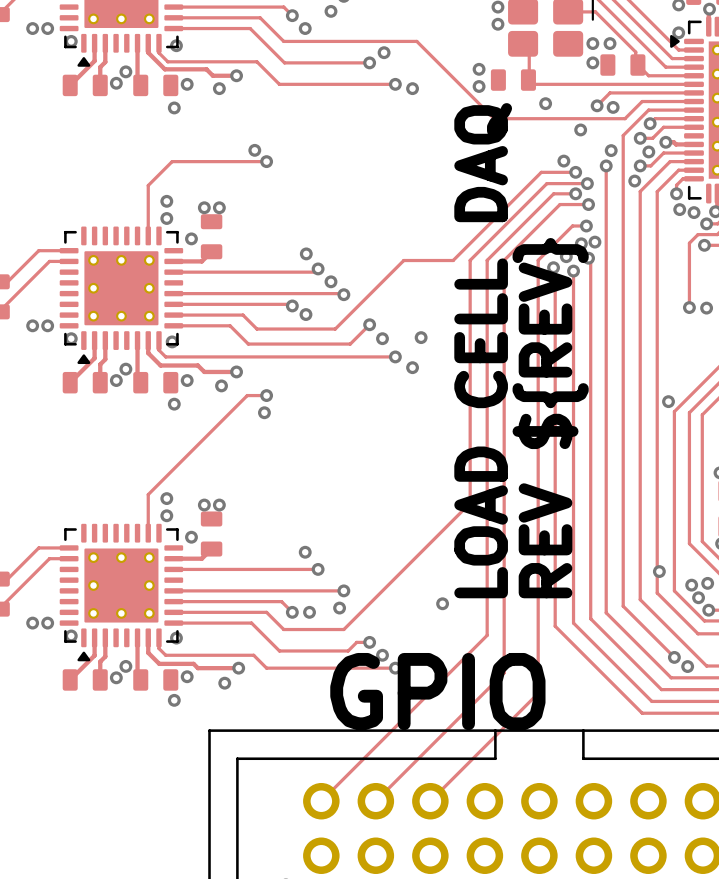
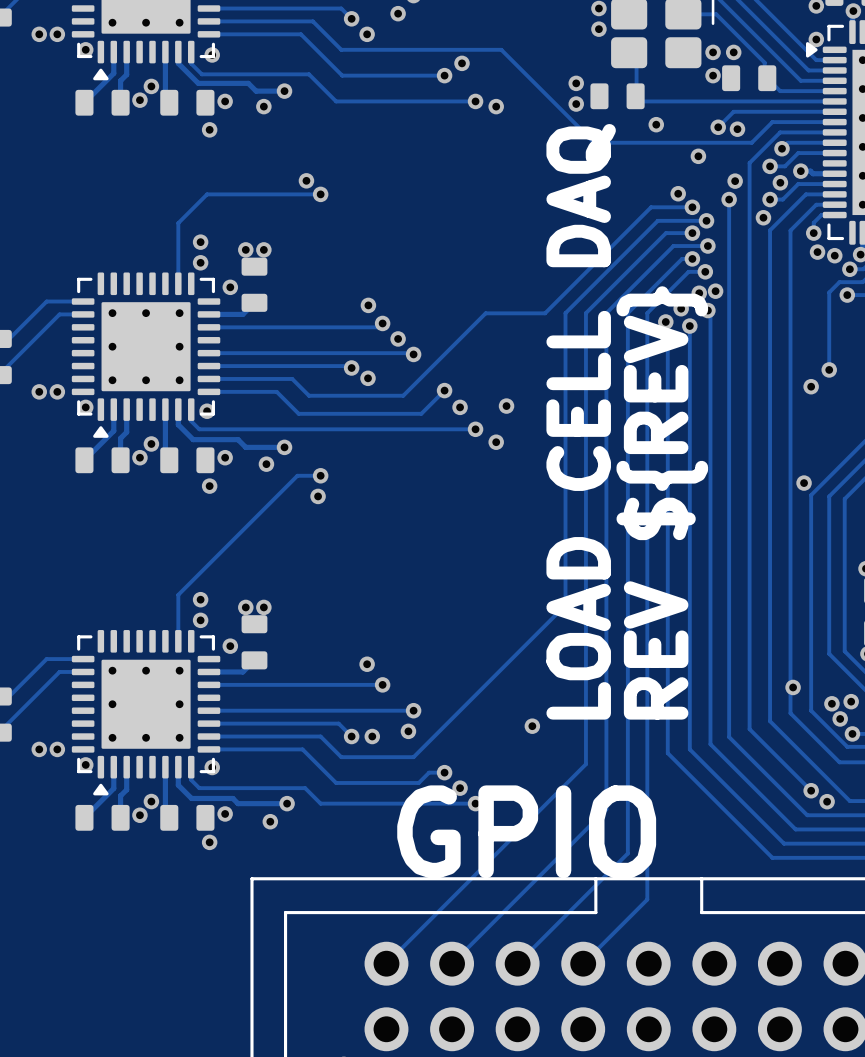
track: none -> (692, 258) (682, 258) (627, 313) (627, 853)
via: none -> (692, 258)
via position: (706, 308) -> (811, 386)
track: (538, 693) (522, 709) -> (647, 834) (647, 899) (583, 963)

